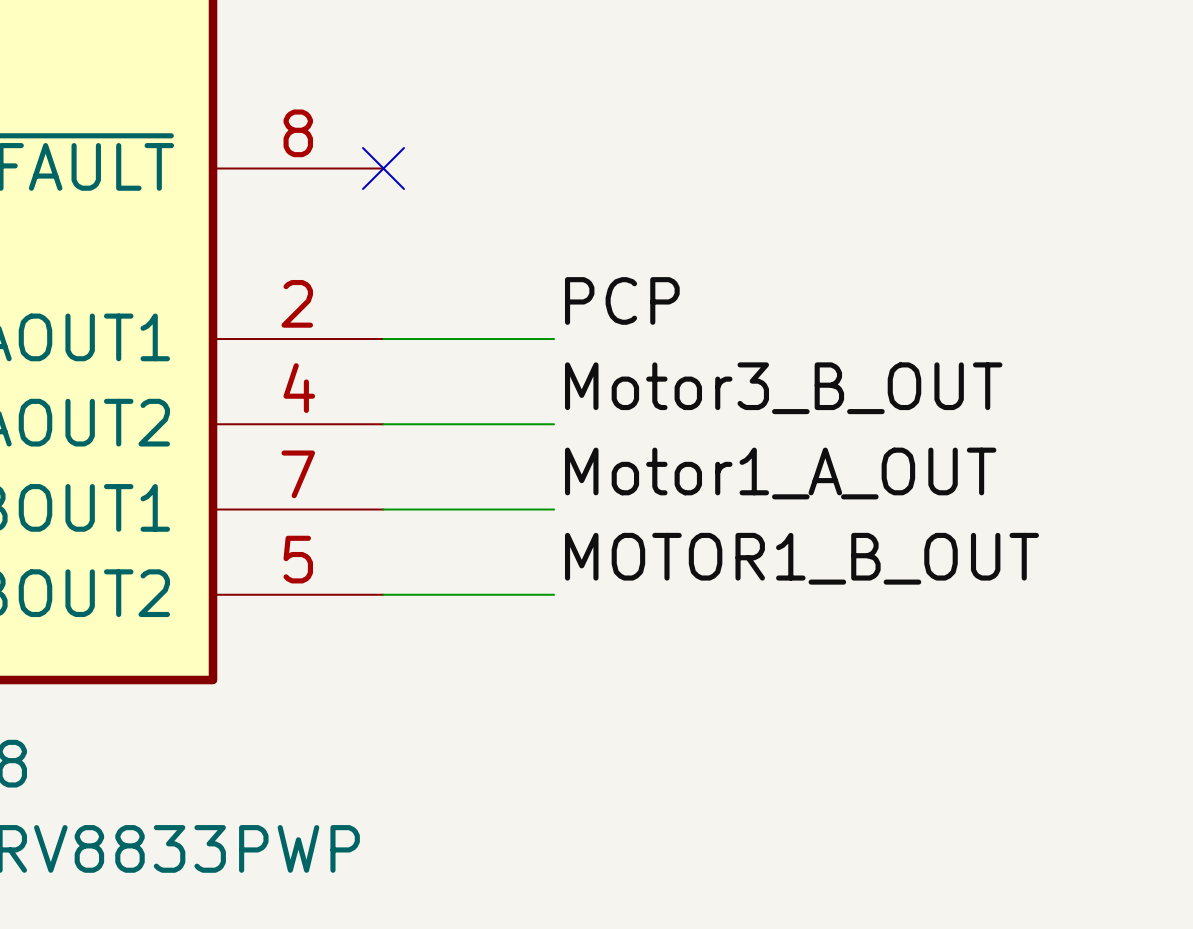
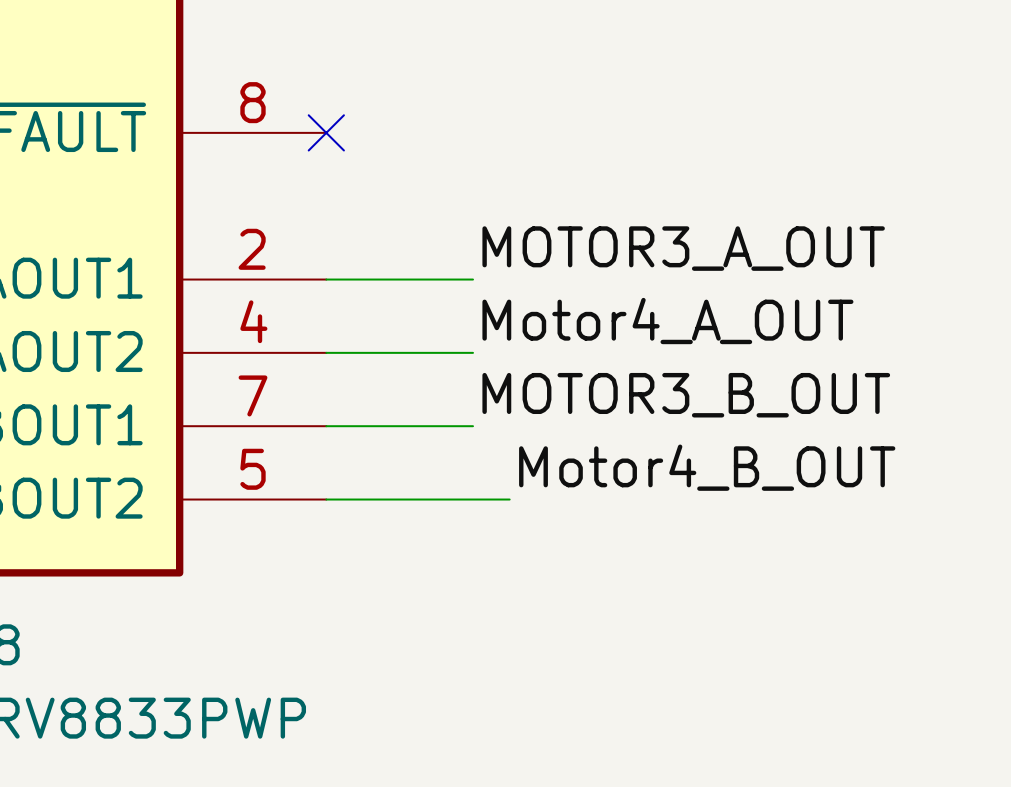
label: PCP (622, 300) -> MOTOR3_A_OUT (683, 248)
label: Motor3_B_OUT (783, 388) -> Motor4_A_OUT (667, 321)
label: Motor1_A_OUT (780, 473) -> MOTOR3_B_OUT (686, 395)
label: none -> Motor4_B_OUT (707, 467)
label: MOTOR1_B_OUT (801, 558) -> none
wire: none -> (472, 499) (509, 499)

